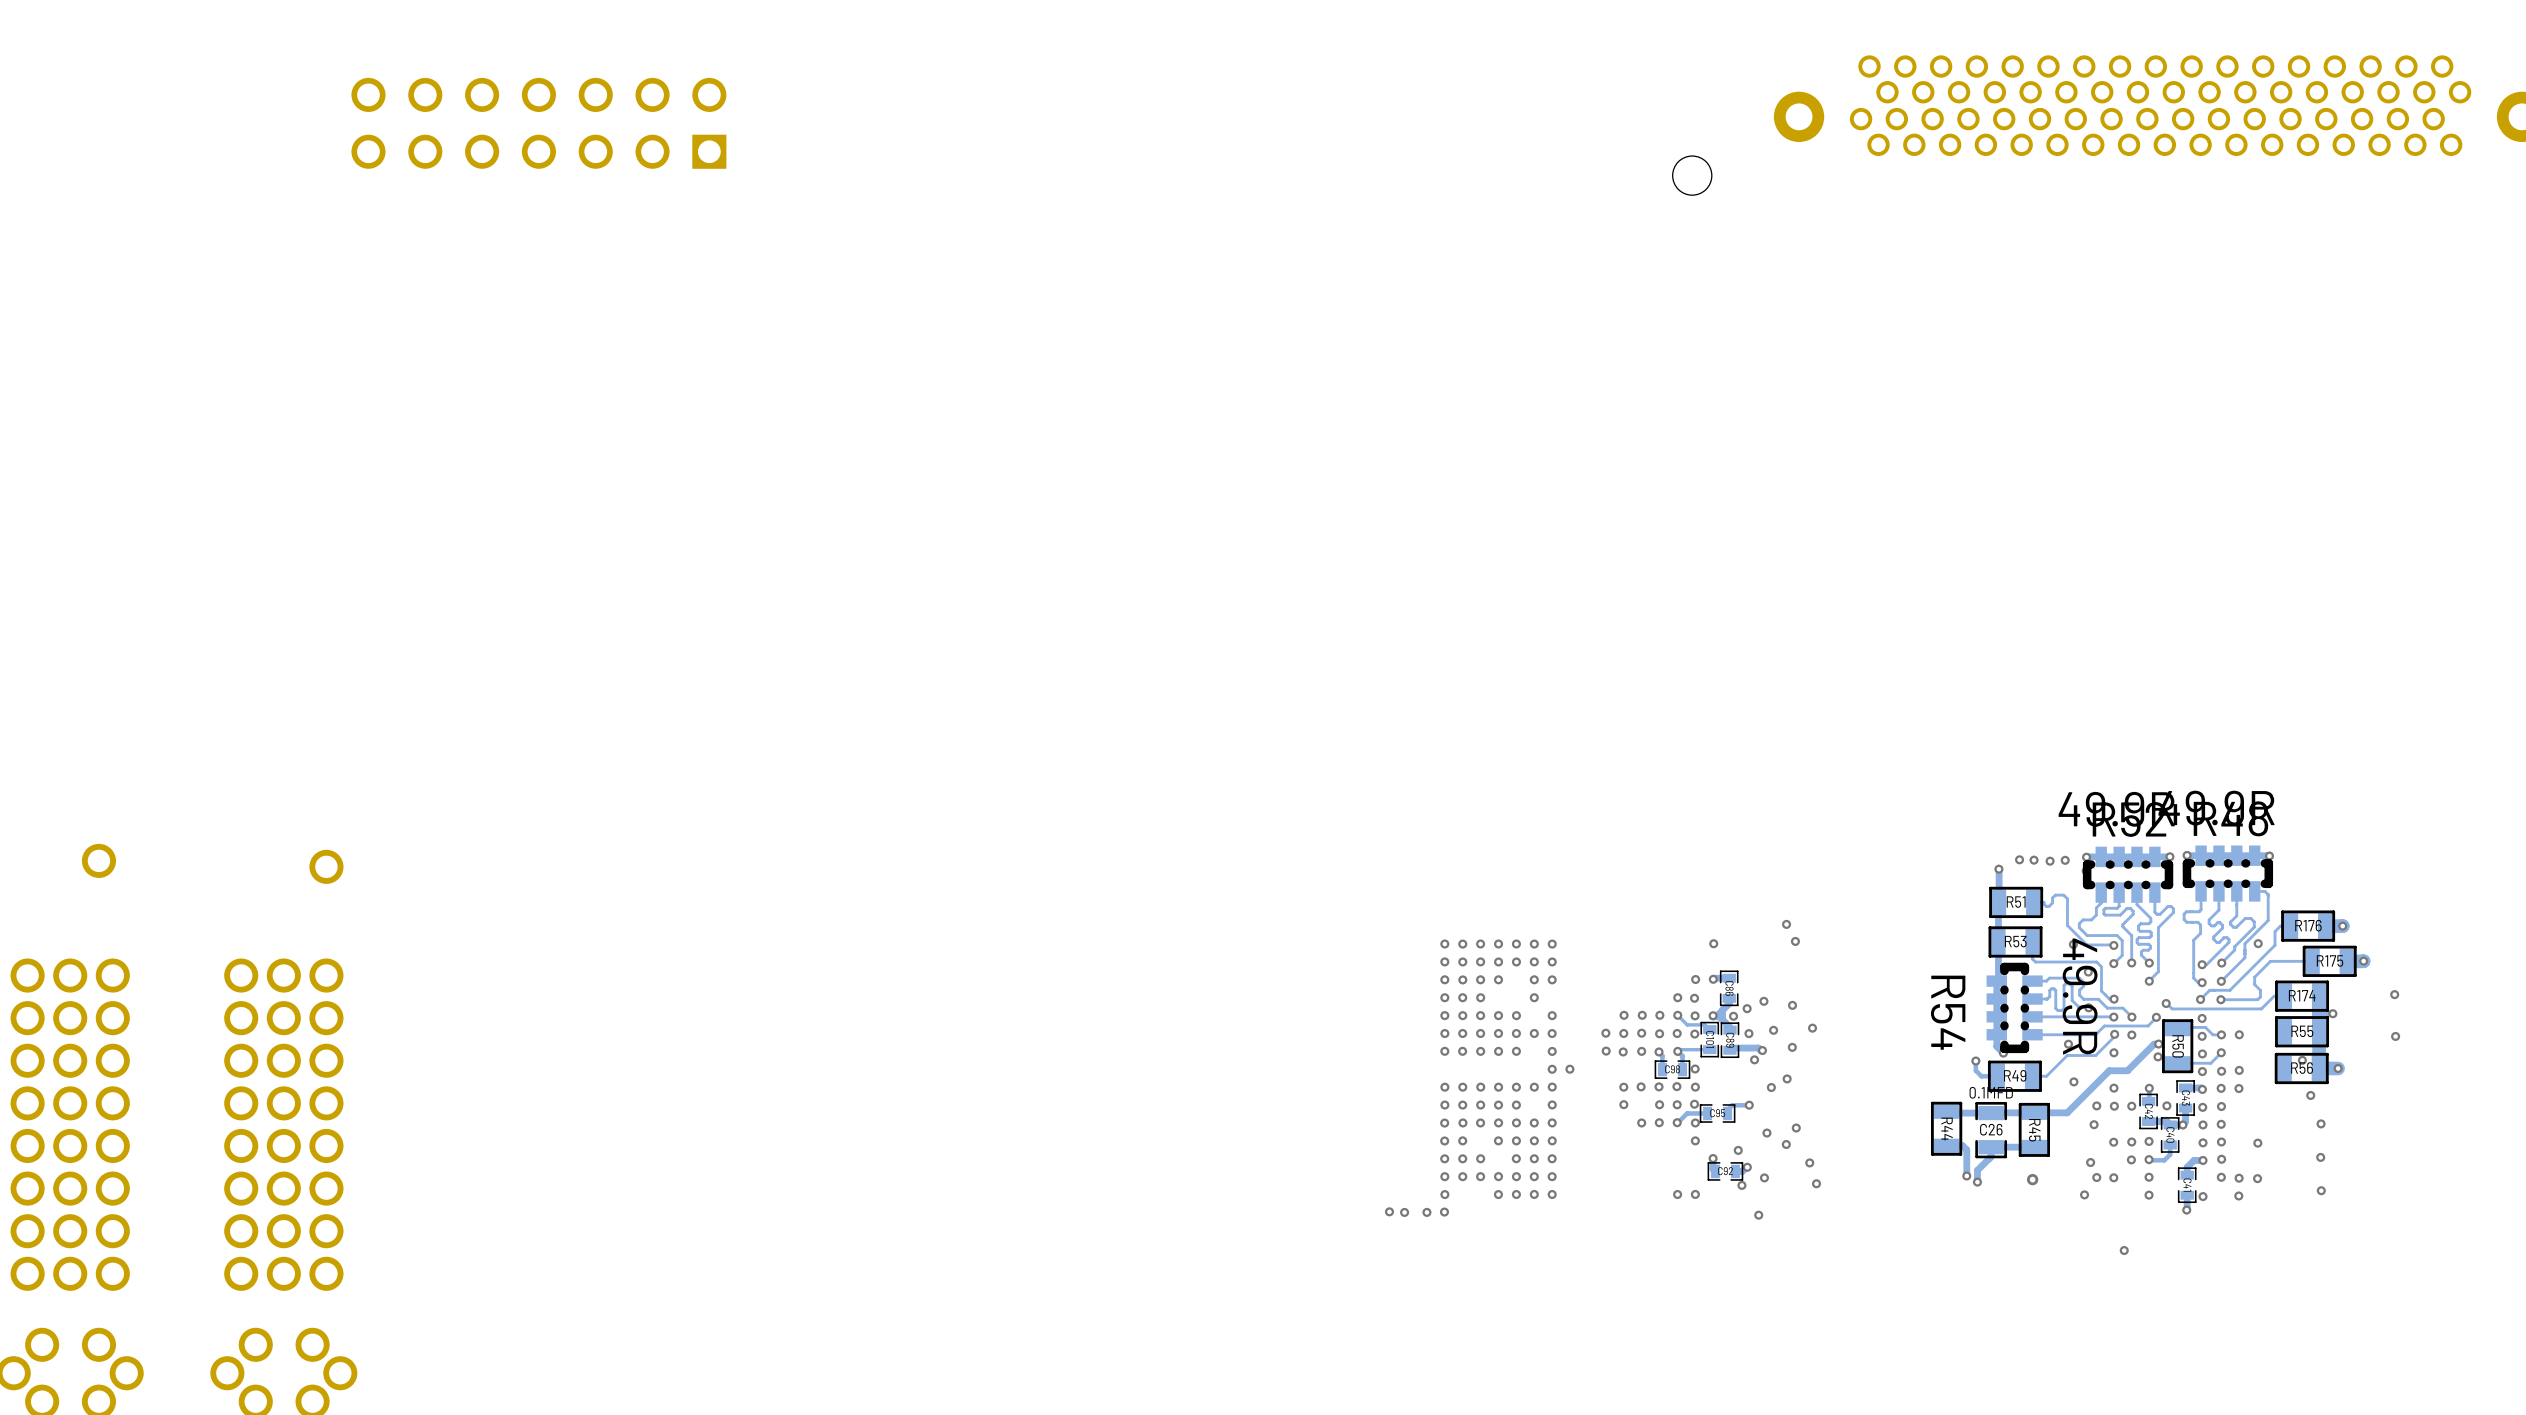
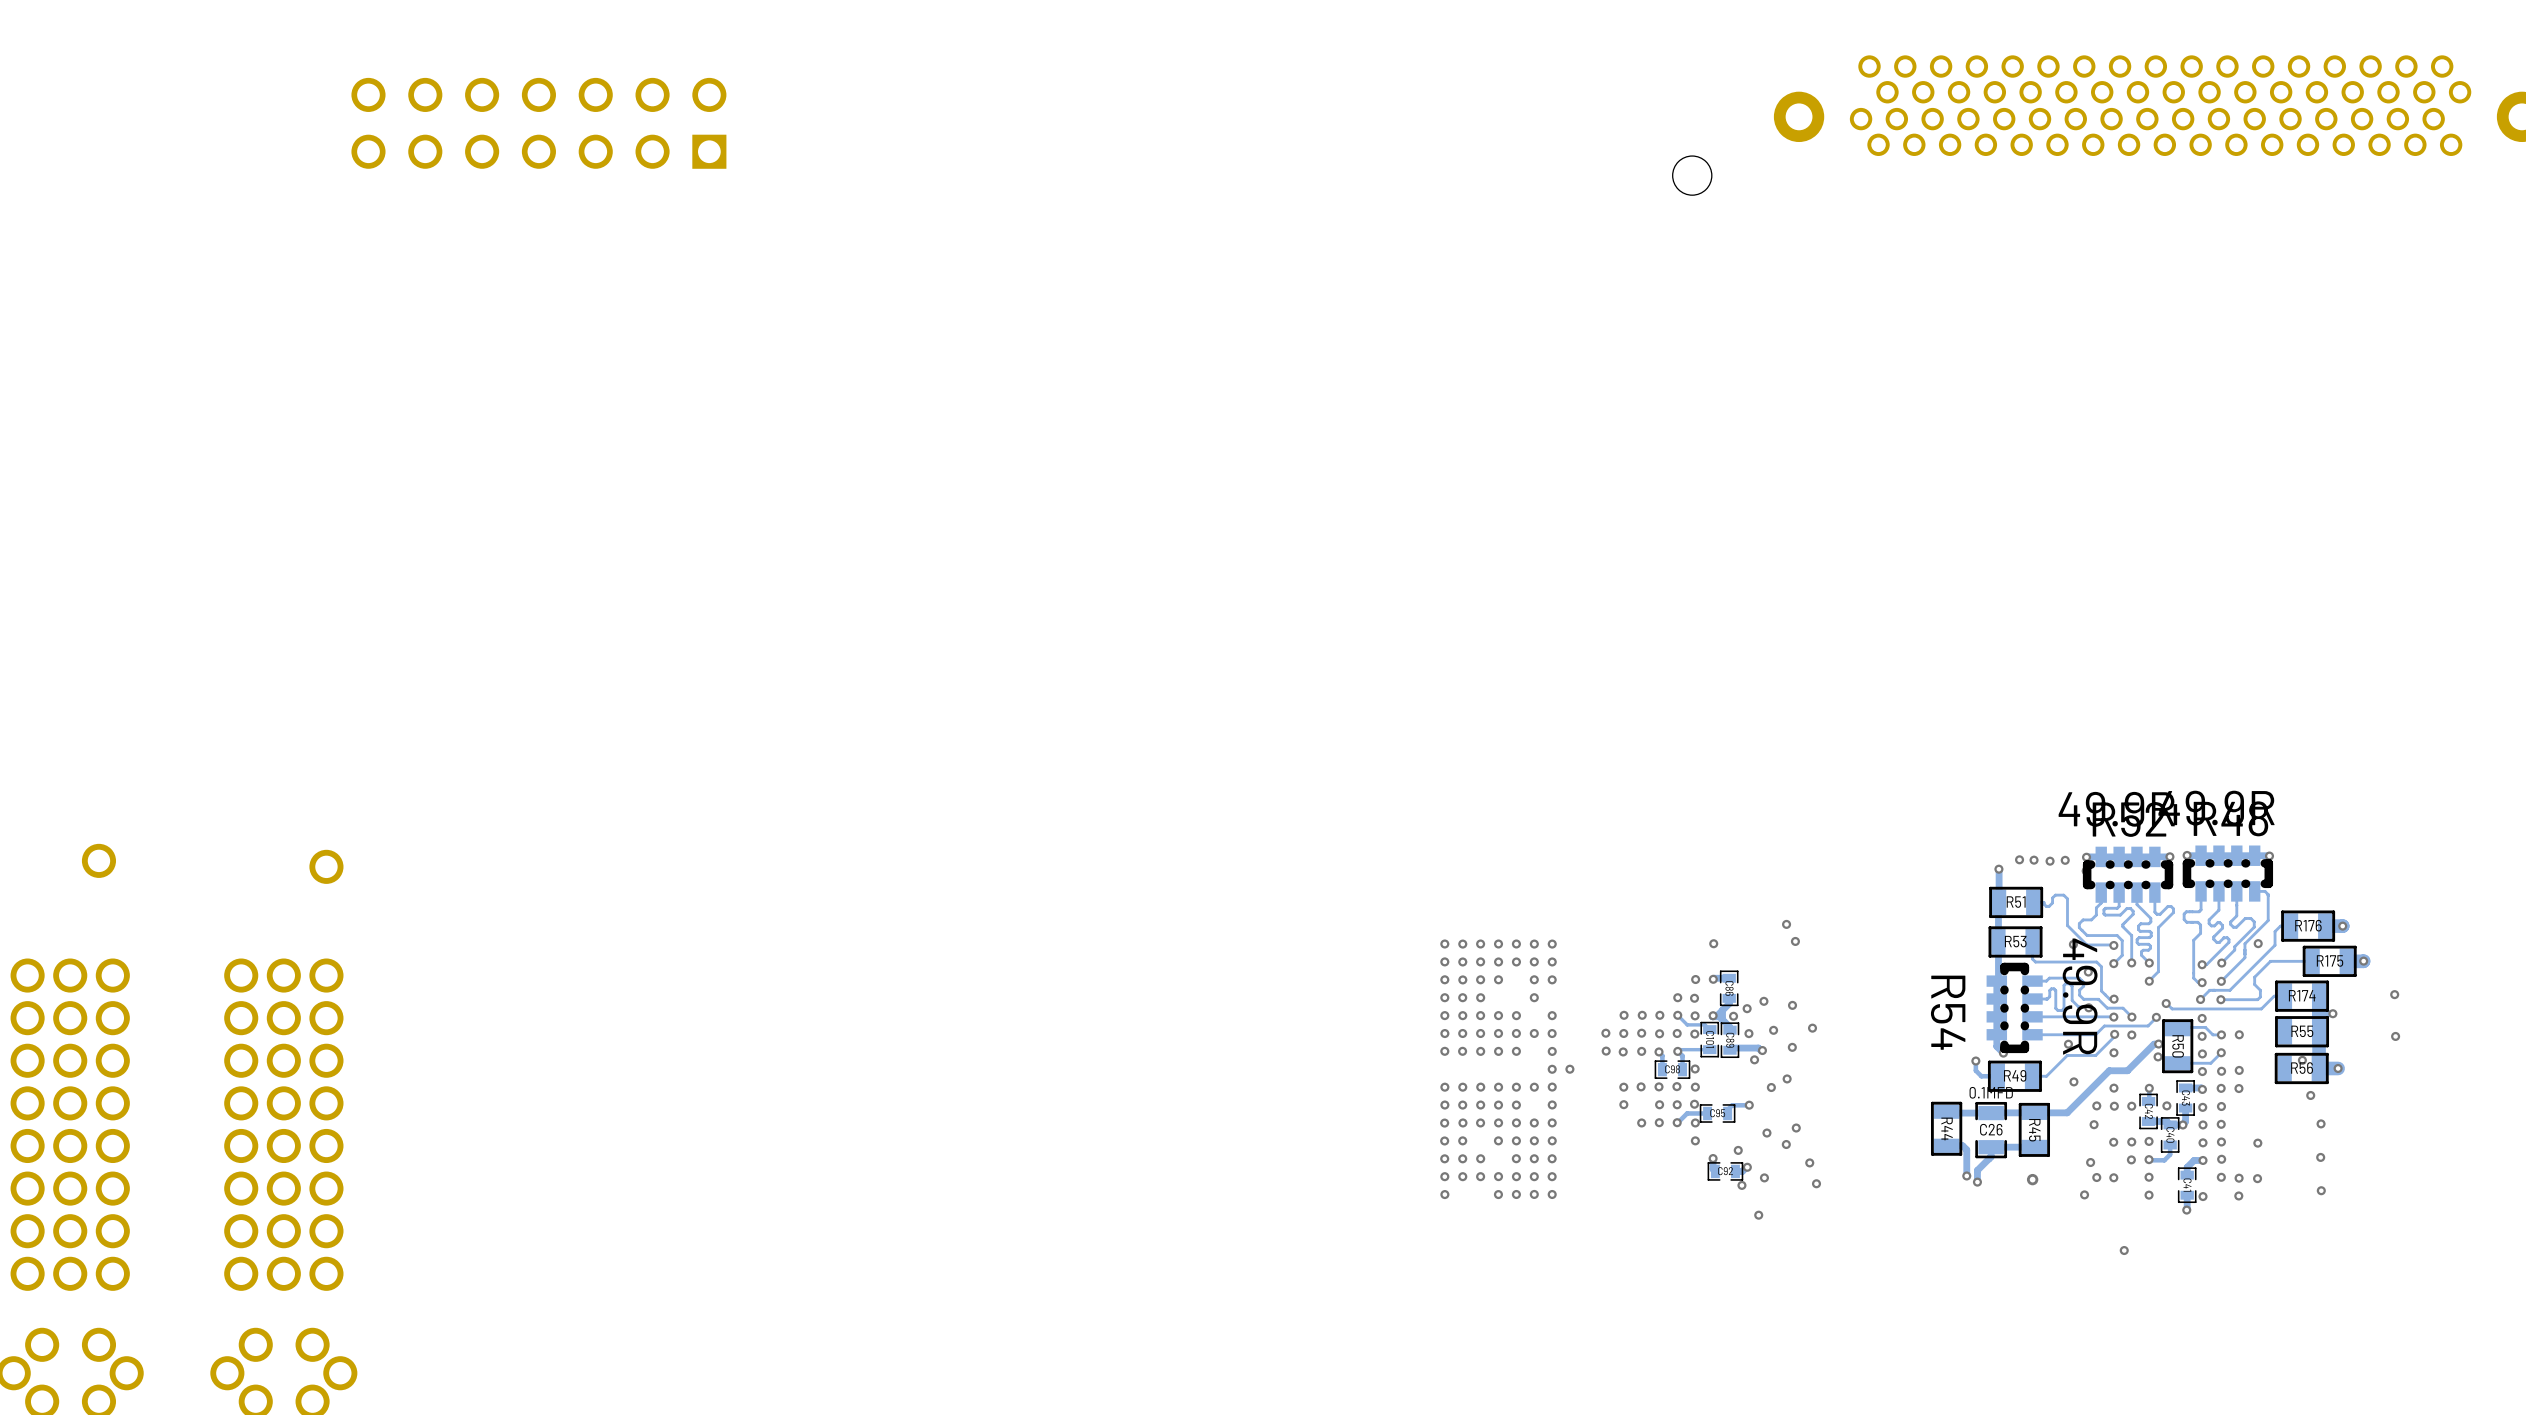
via: (1677, 1194) -> none
via: (1695, 1194) -> none
via: (1389, 1211) -> none
via: (1404, 1212) -> none
via: (1426, 1212) -> none
via: (1444, 1212) -> none

